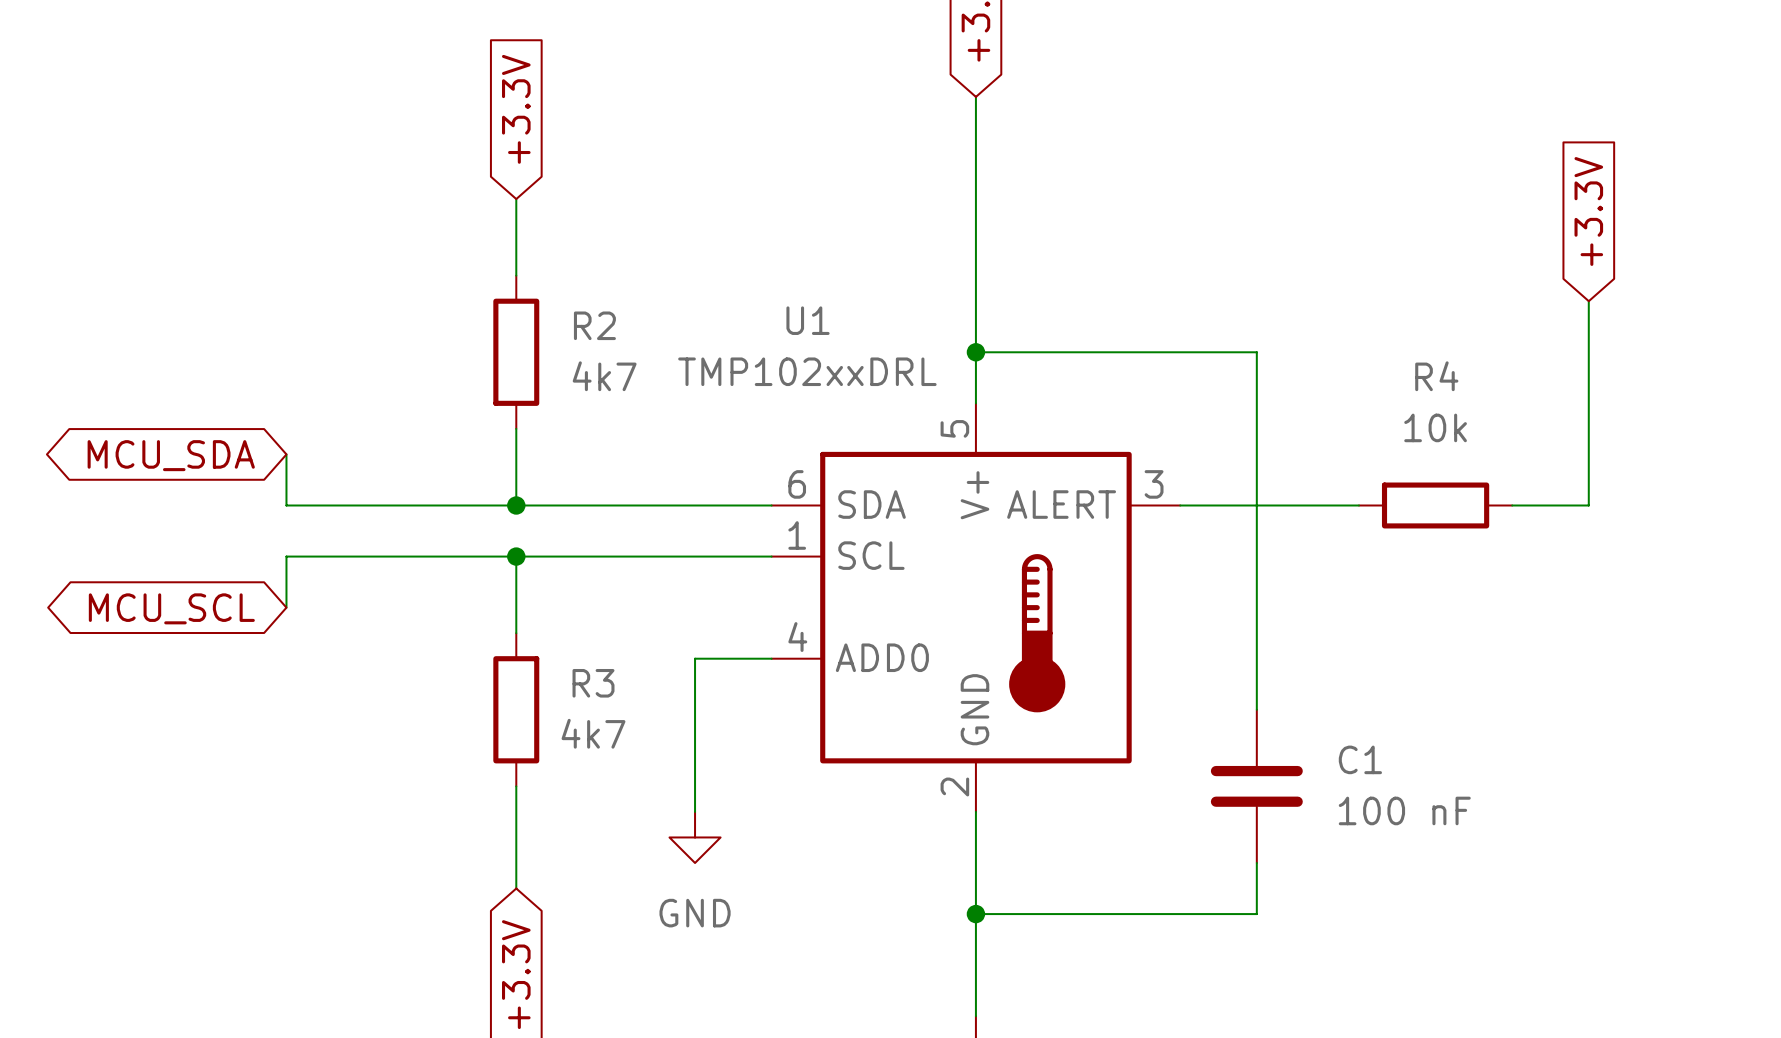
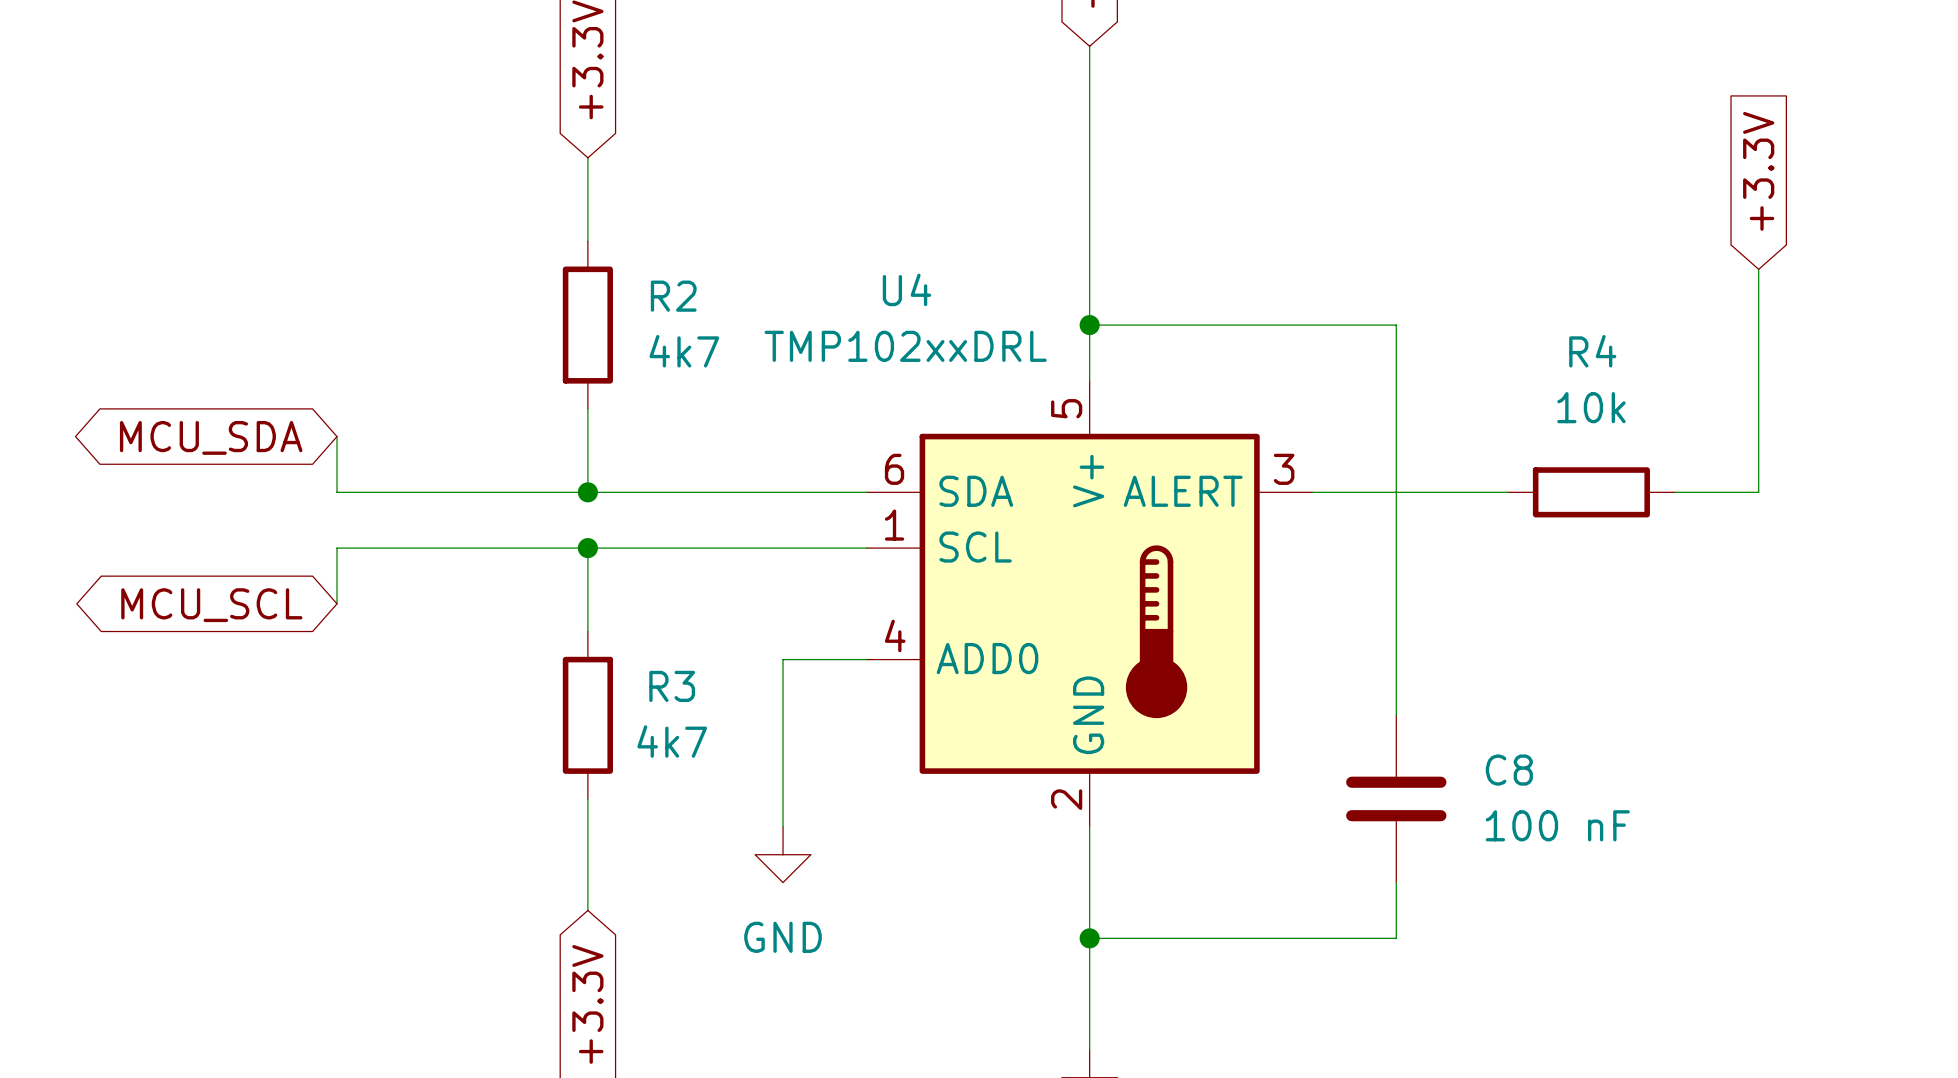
U1 name: U1 (808, 320) -> U4 (907, 289)
C1 name: C1 (1360, 759) -> C8 (1509, 770)

